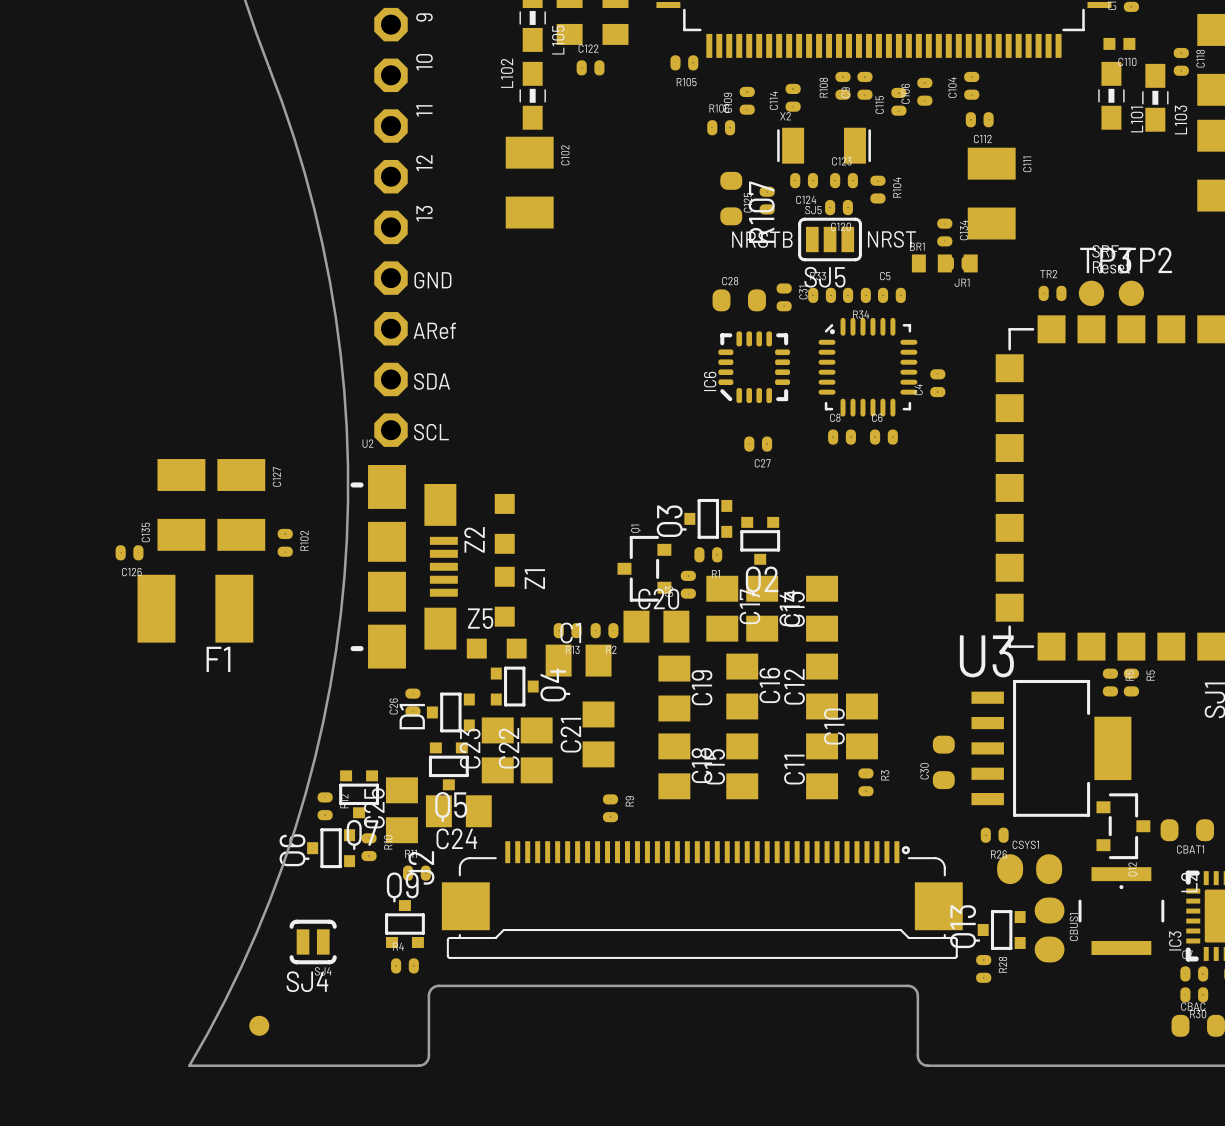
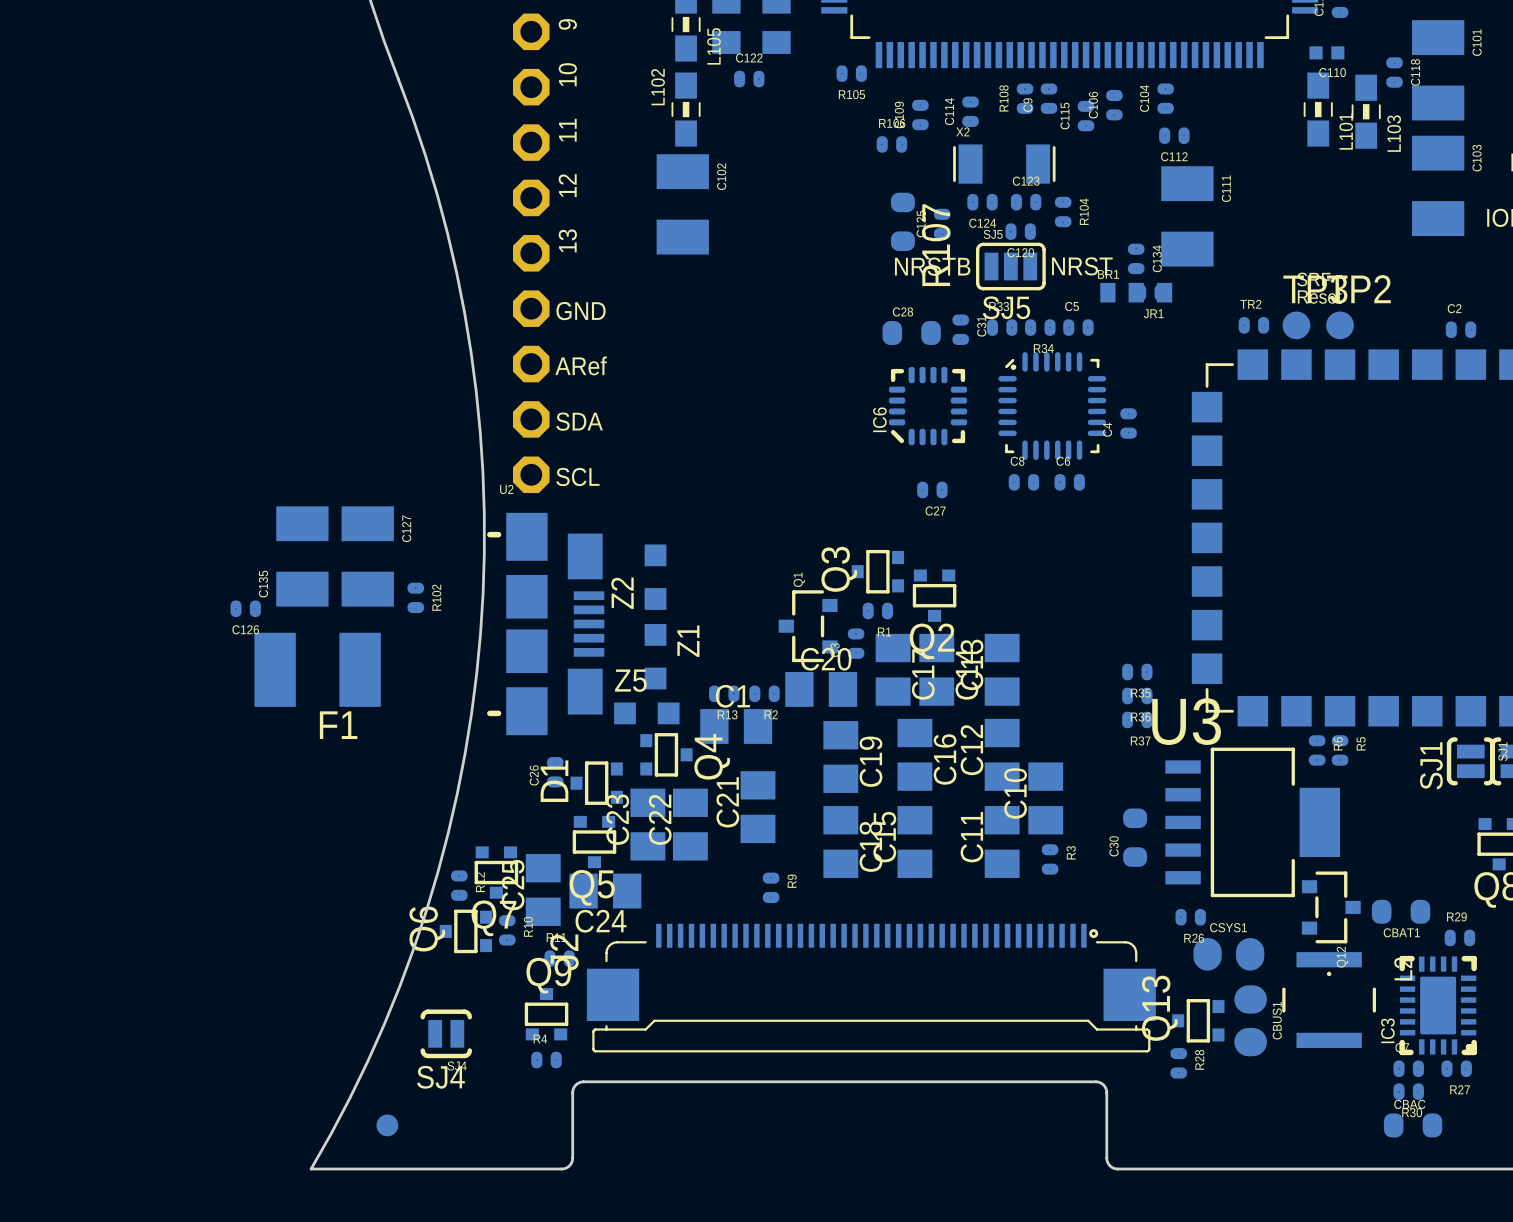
R35: none -> (1137, 671)
R36: none -> (1137, 695)
R37: none -> (1137, 719)

